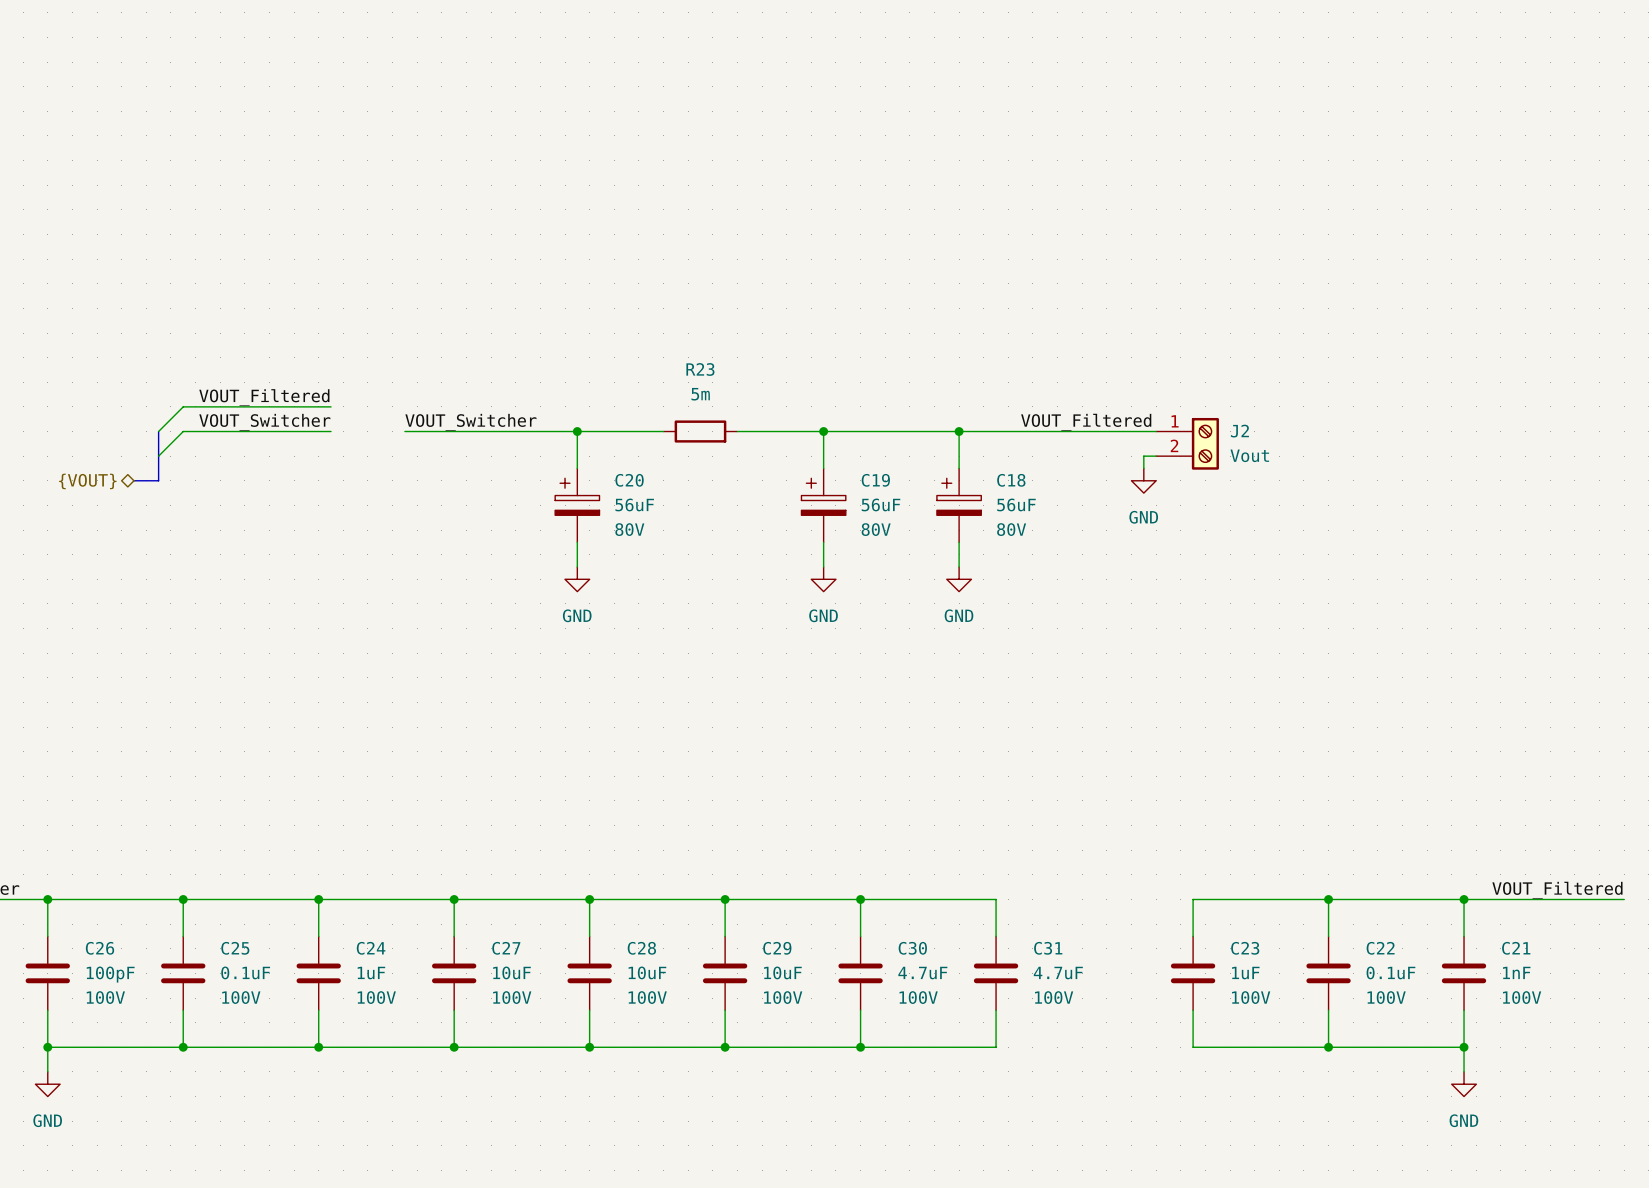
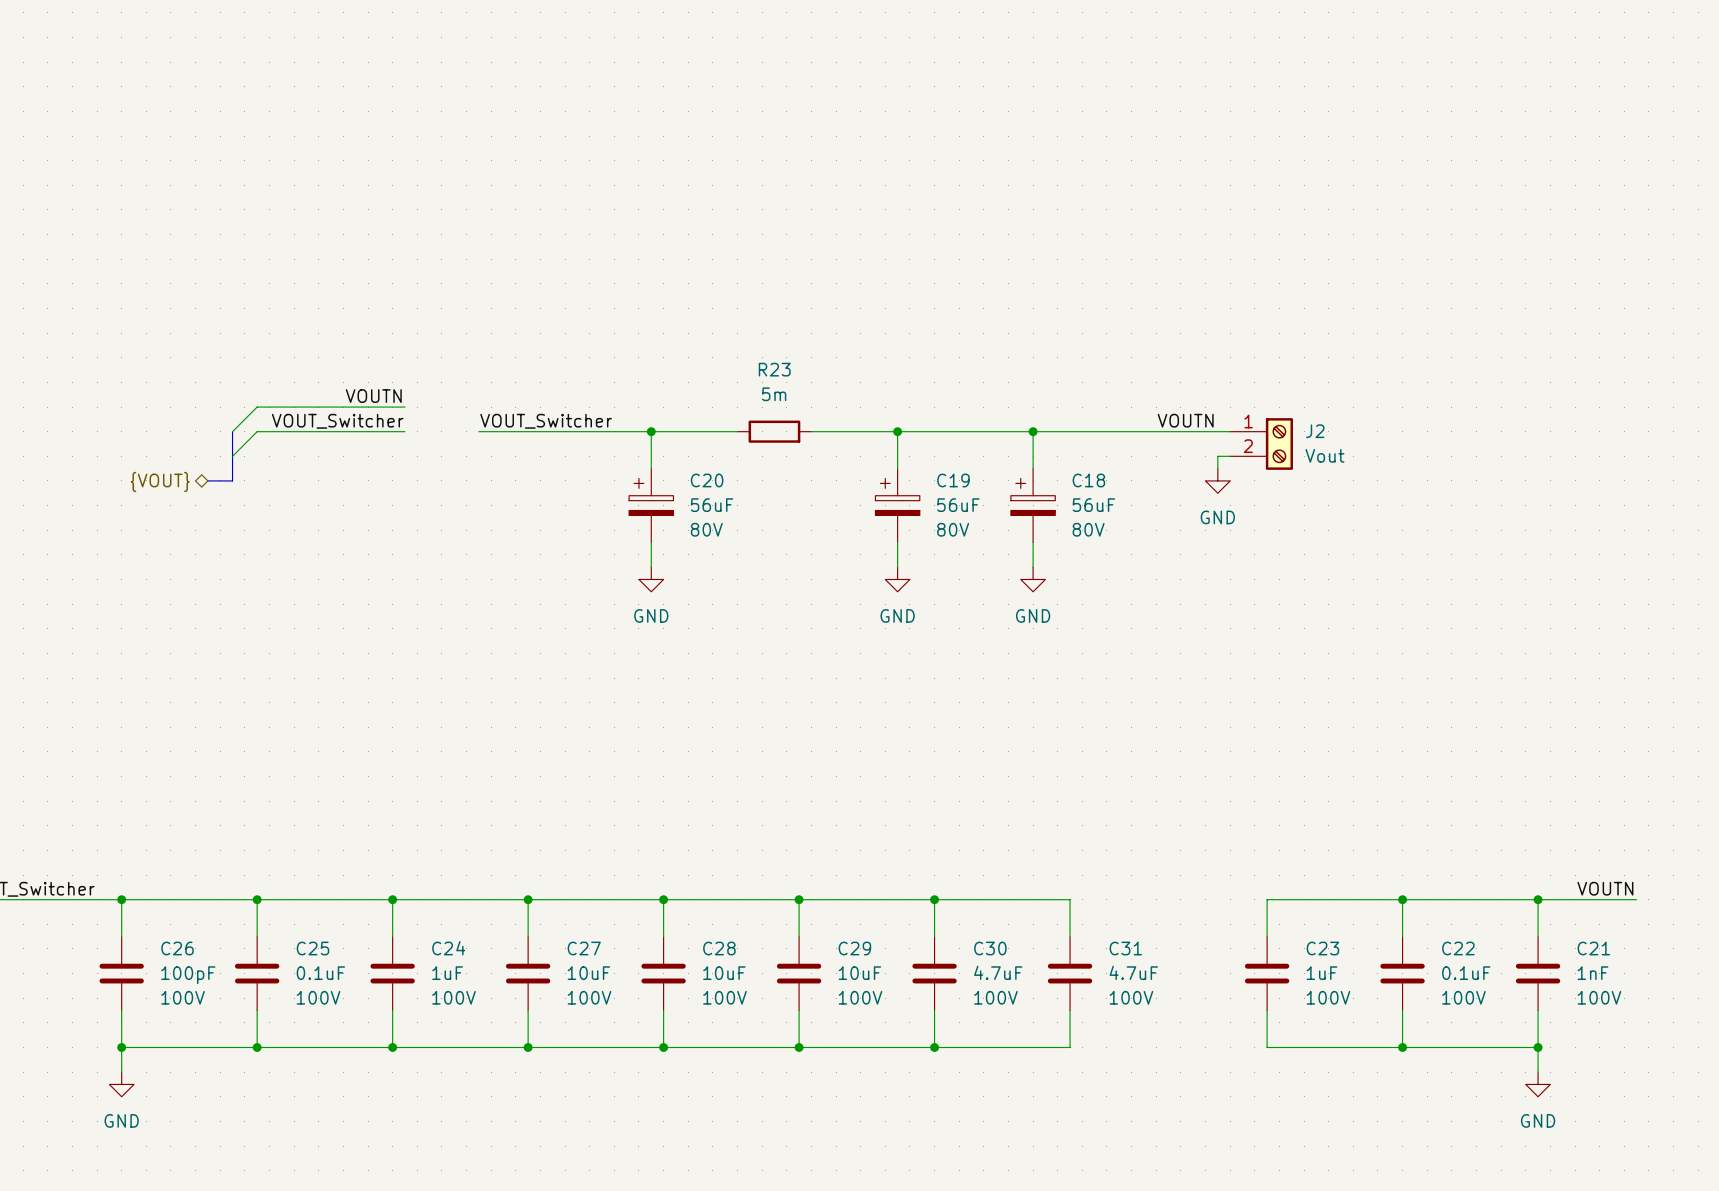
label: VOUT_Filtered (264, 397) -> VOUTN (373, 396)
label: none -> VOUTN (1185, 420)
label: VOUT_Filtered (1086, 422) -> none
label: none -> VOUTN (1605, 888)
label: VOUT_Filtered (1557, 890) -> none
wire: (1562, 899) (1624, 899) -> none

